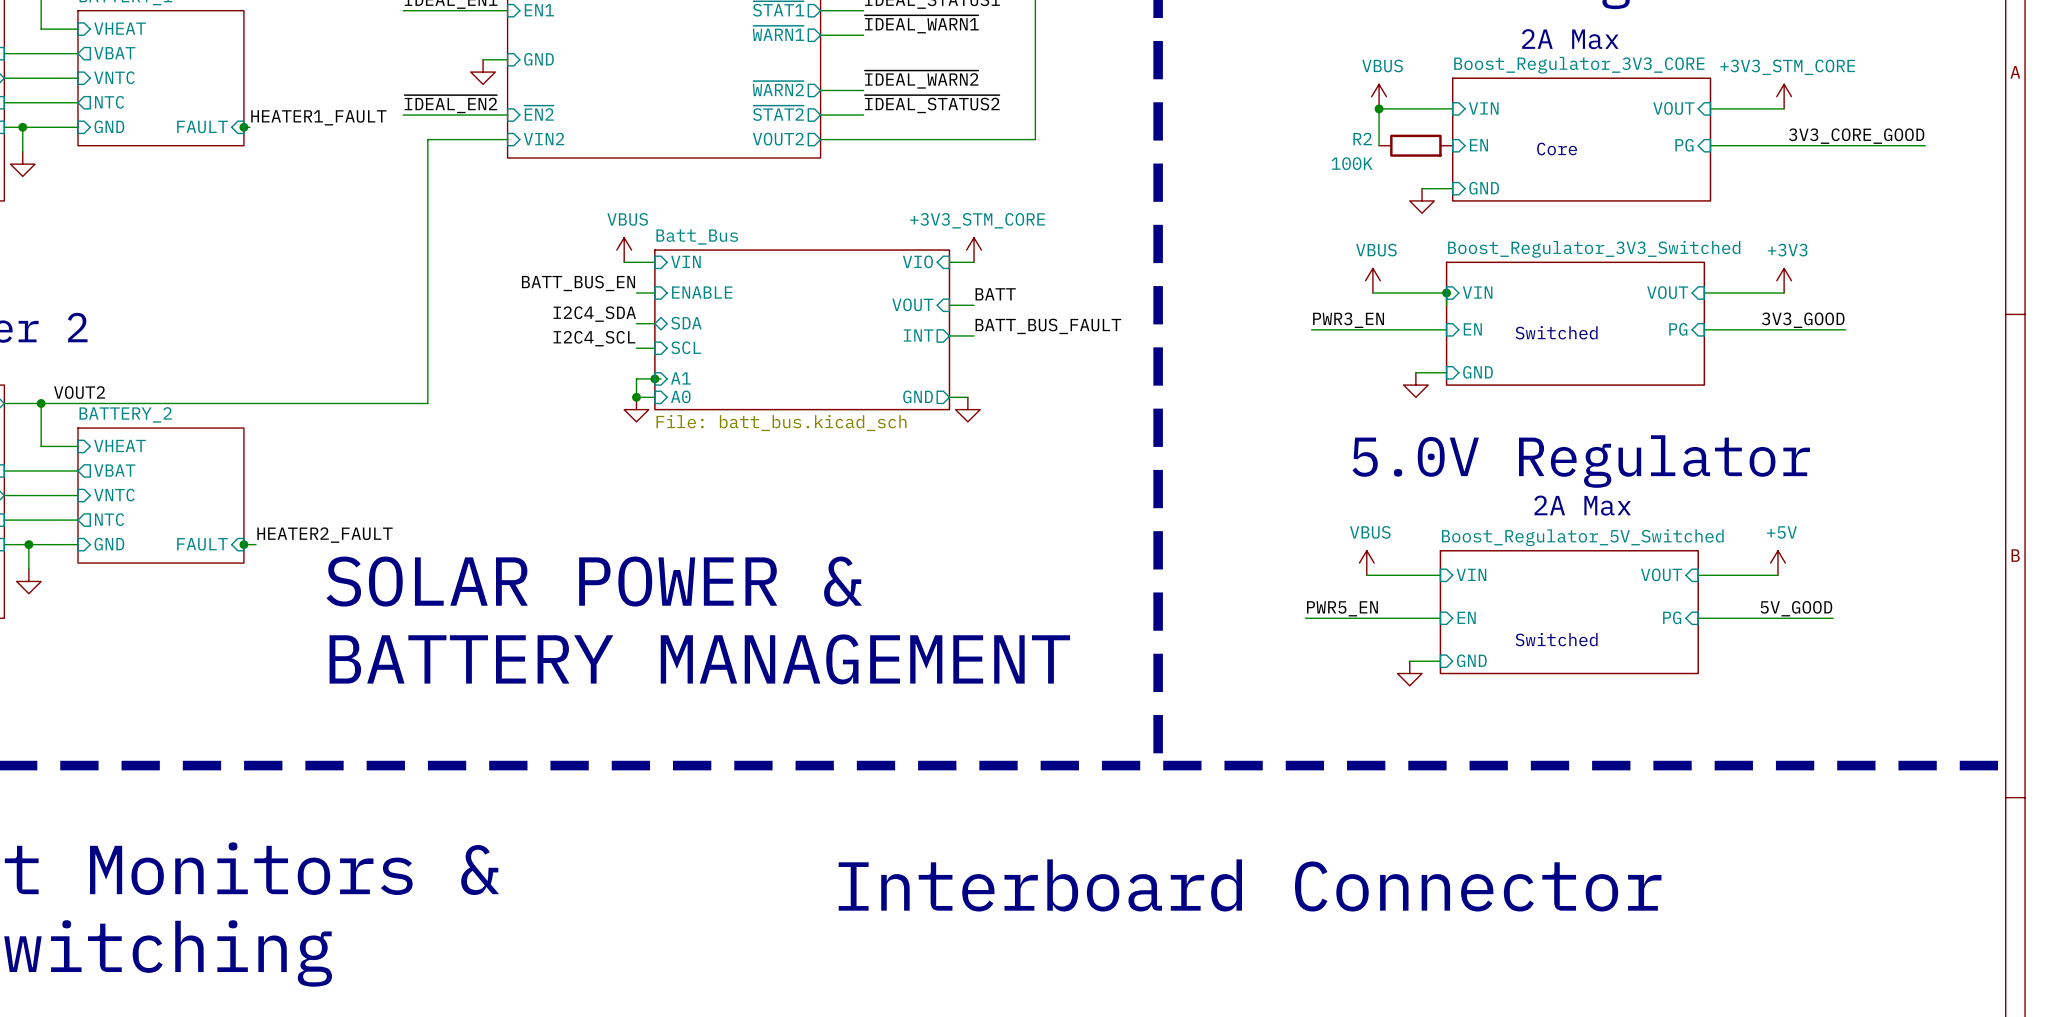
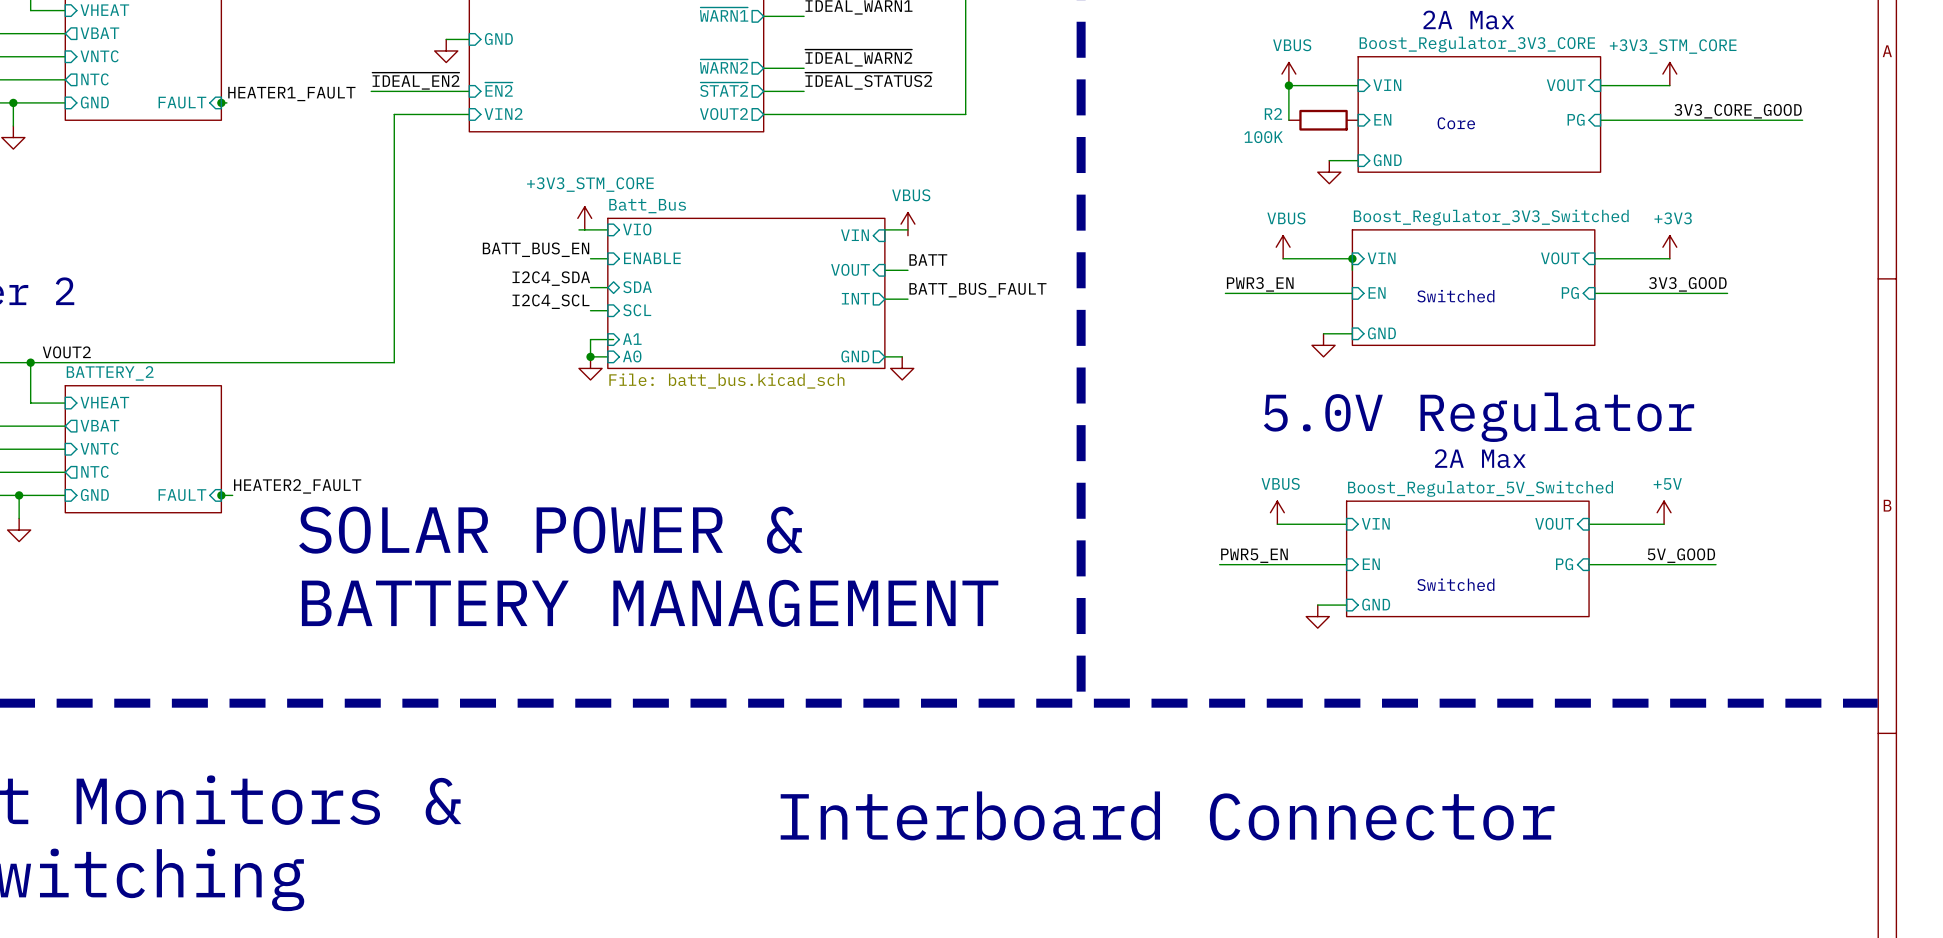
power symbol: VBUS (624, 250) -> +3V3_STM_CORE (584, 218)
power symbol: +3V3_STM_CORE (974, 250) -> VBUS (907, 224)
sheet pin: VIN (685, 261) -> VIO (637, 229)
sheet pin: VIO (917, 261) -> VIN (854, 235)
junction: (654, 378) -> none

